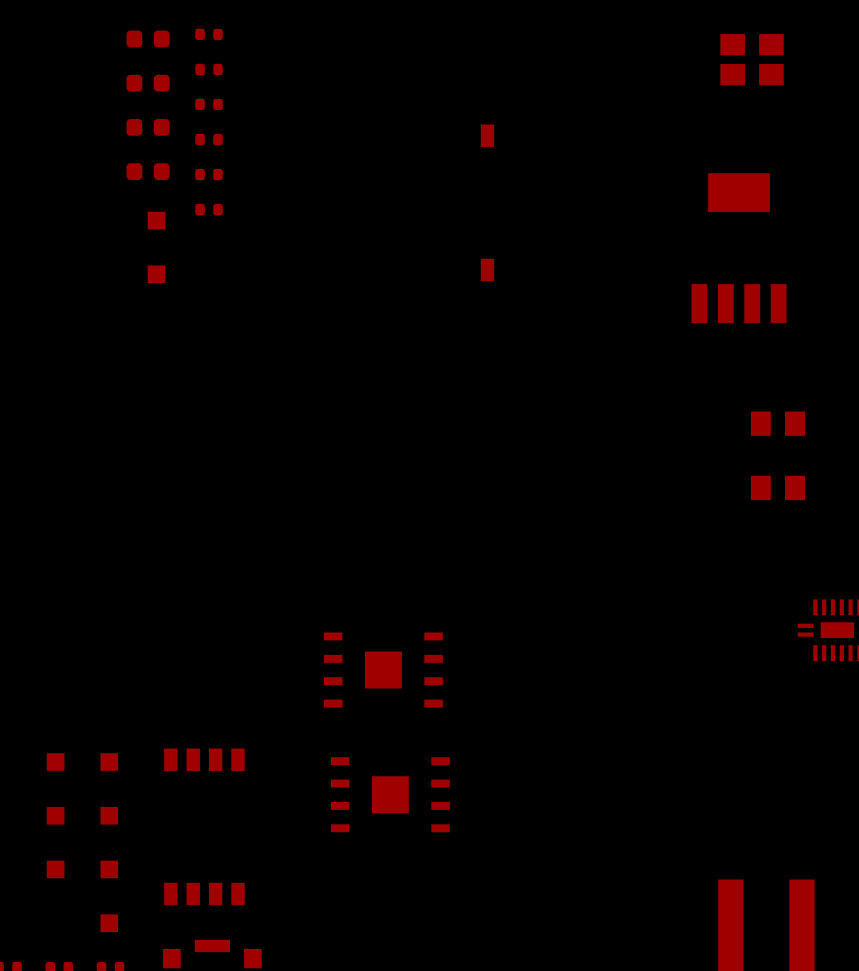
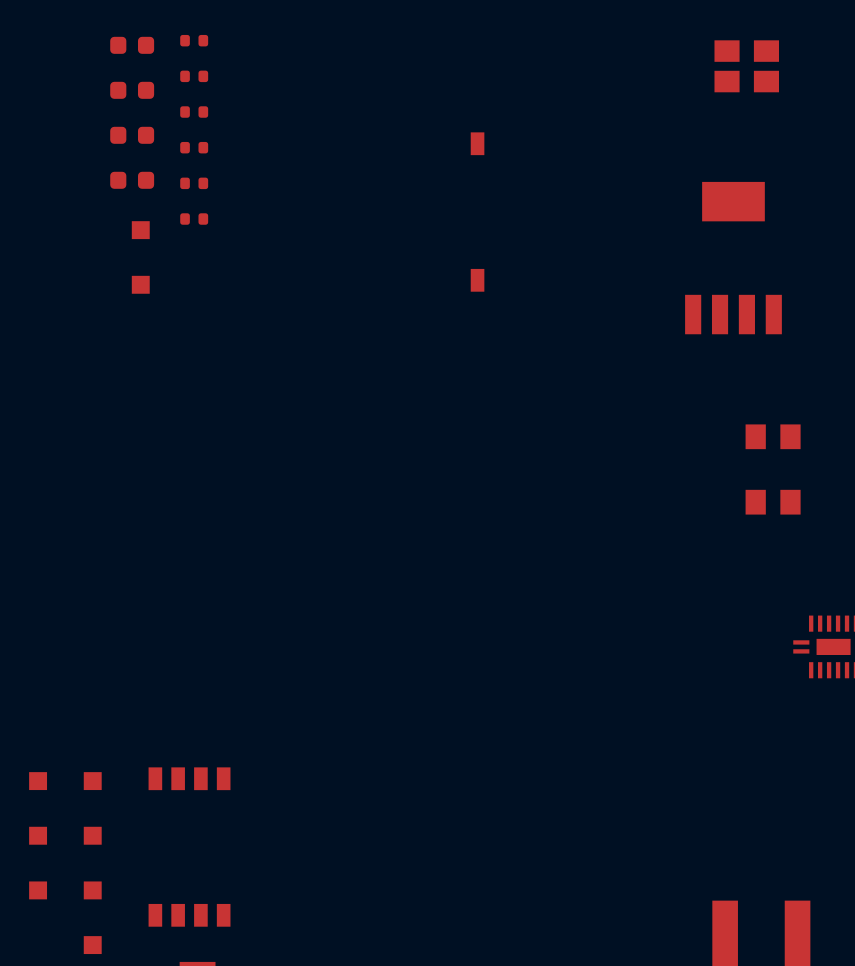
part: (383, 670) -> none
part: (390, 794) -> none

